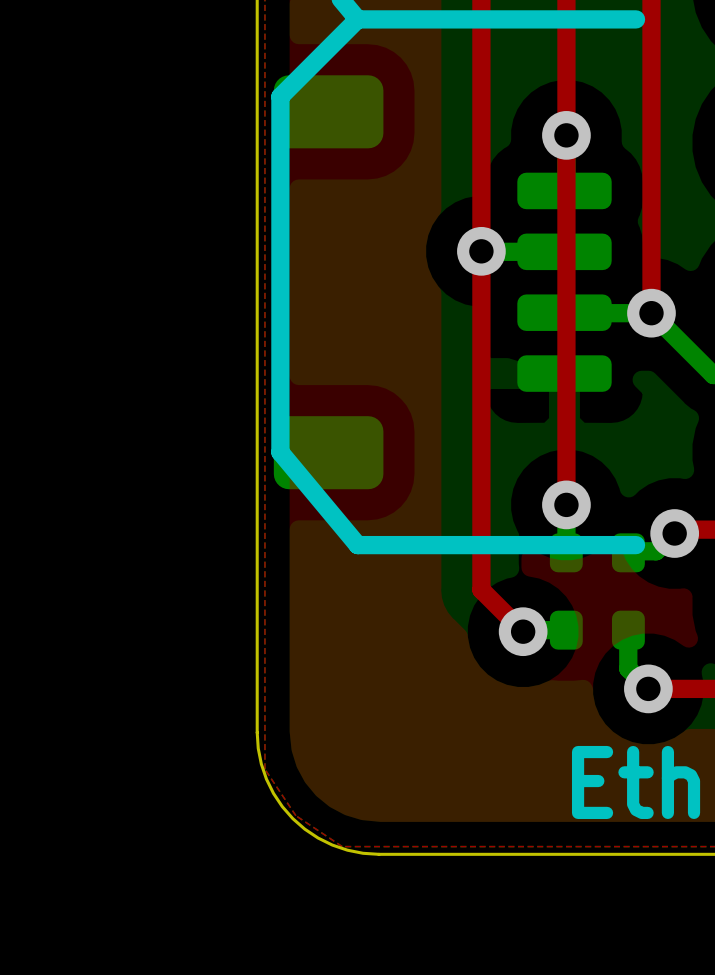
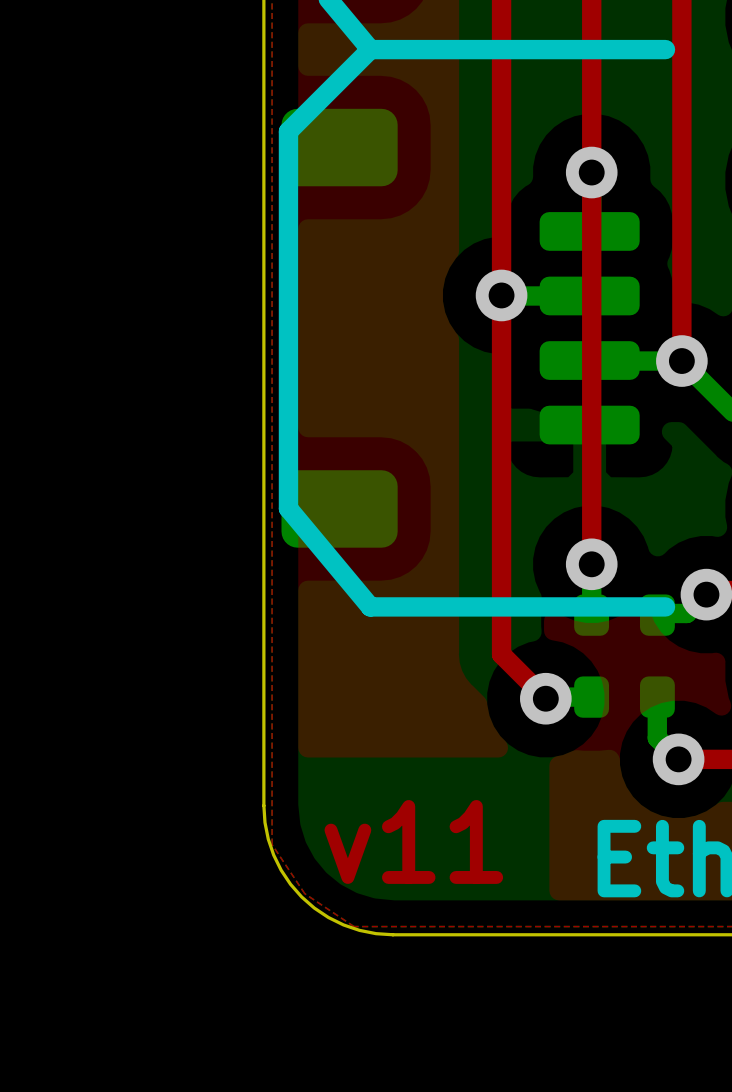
text: none -> v11 (413, 841)

